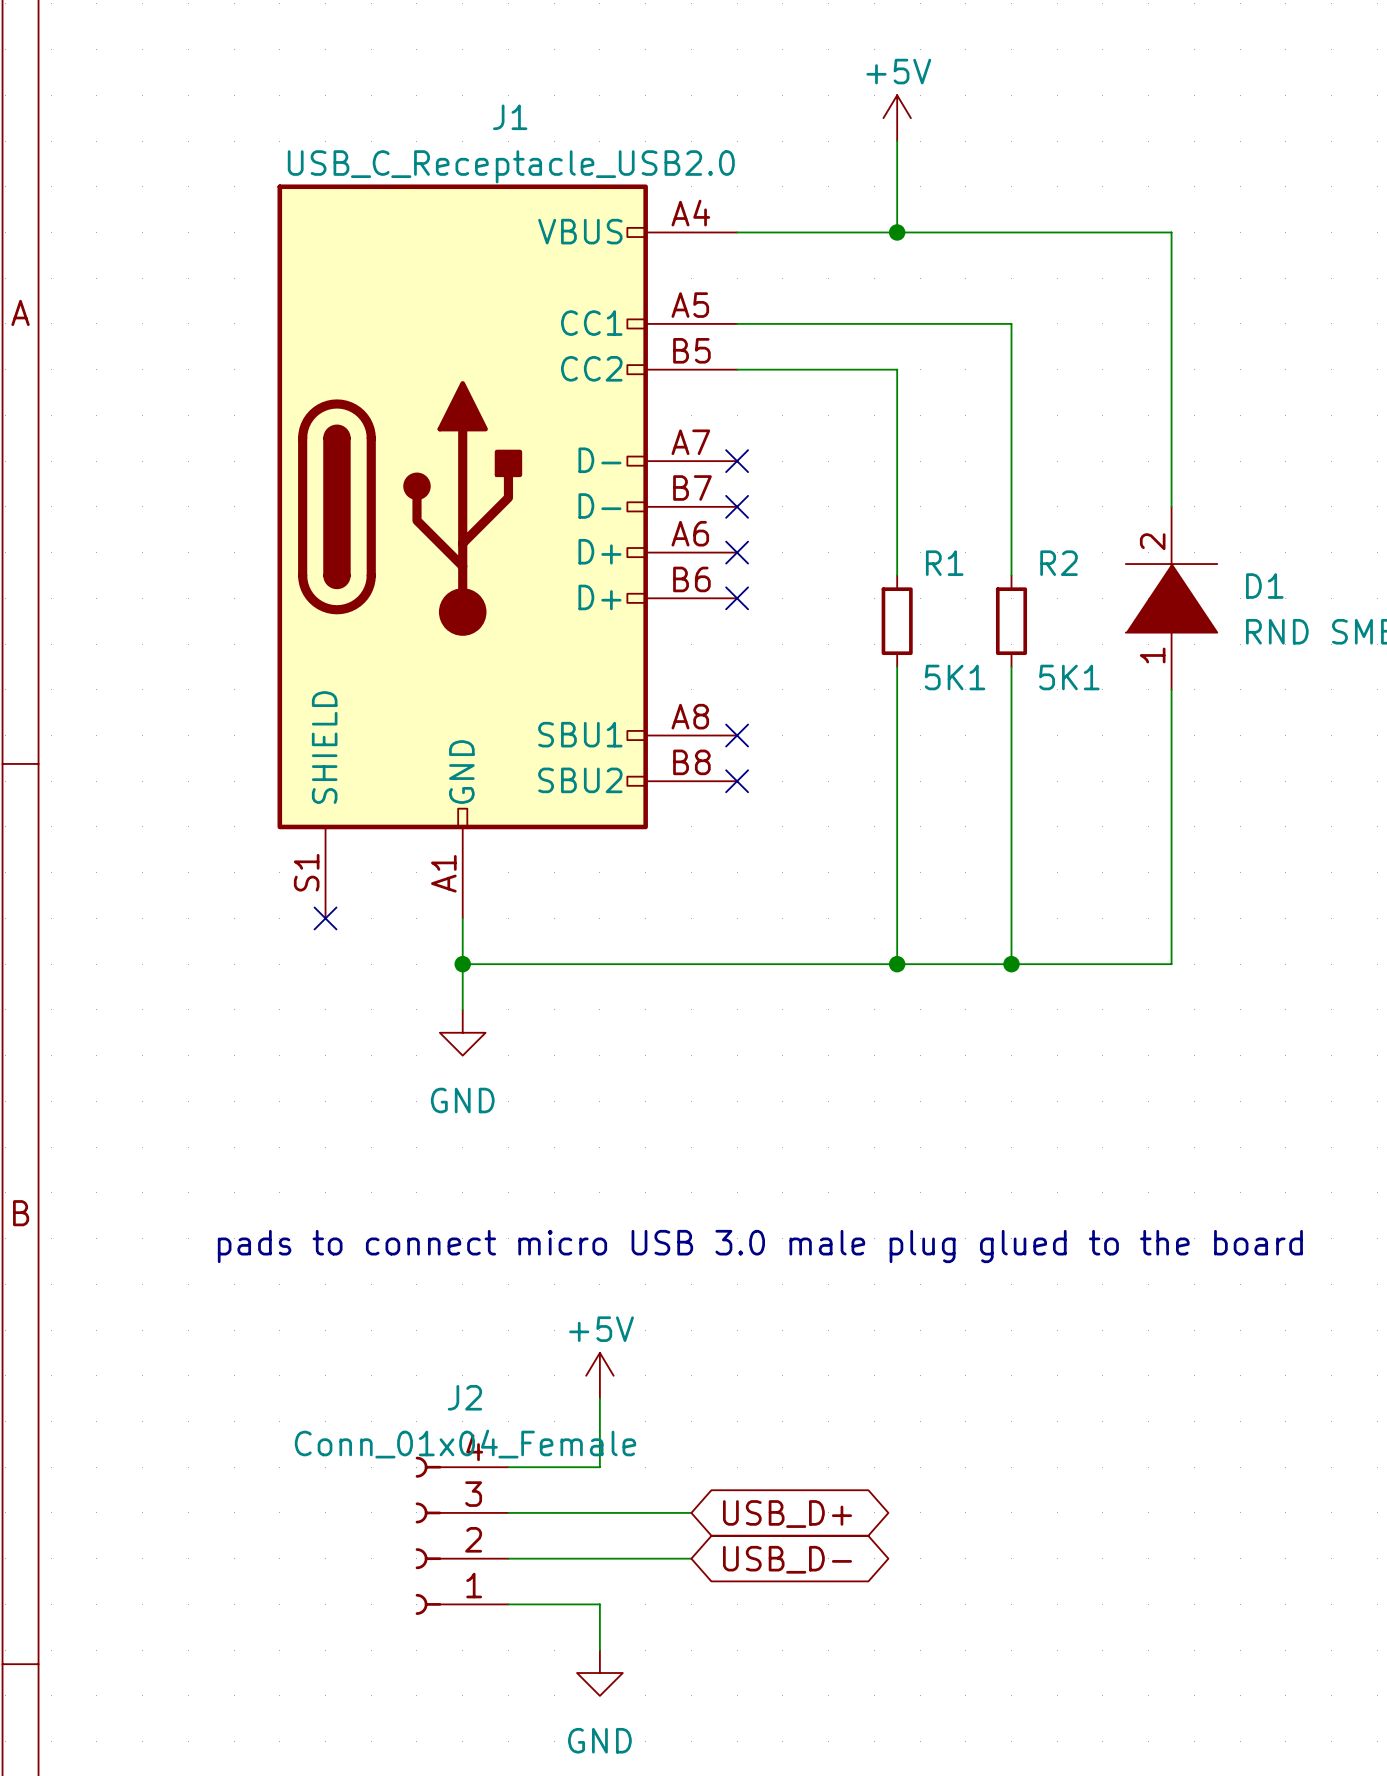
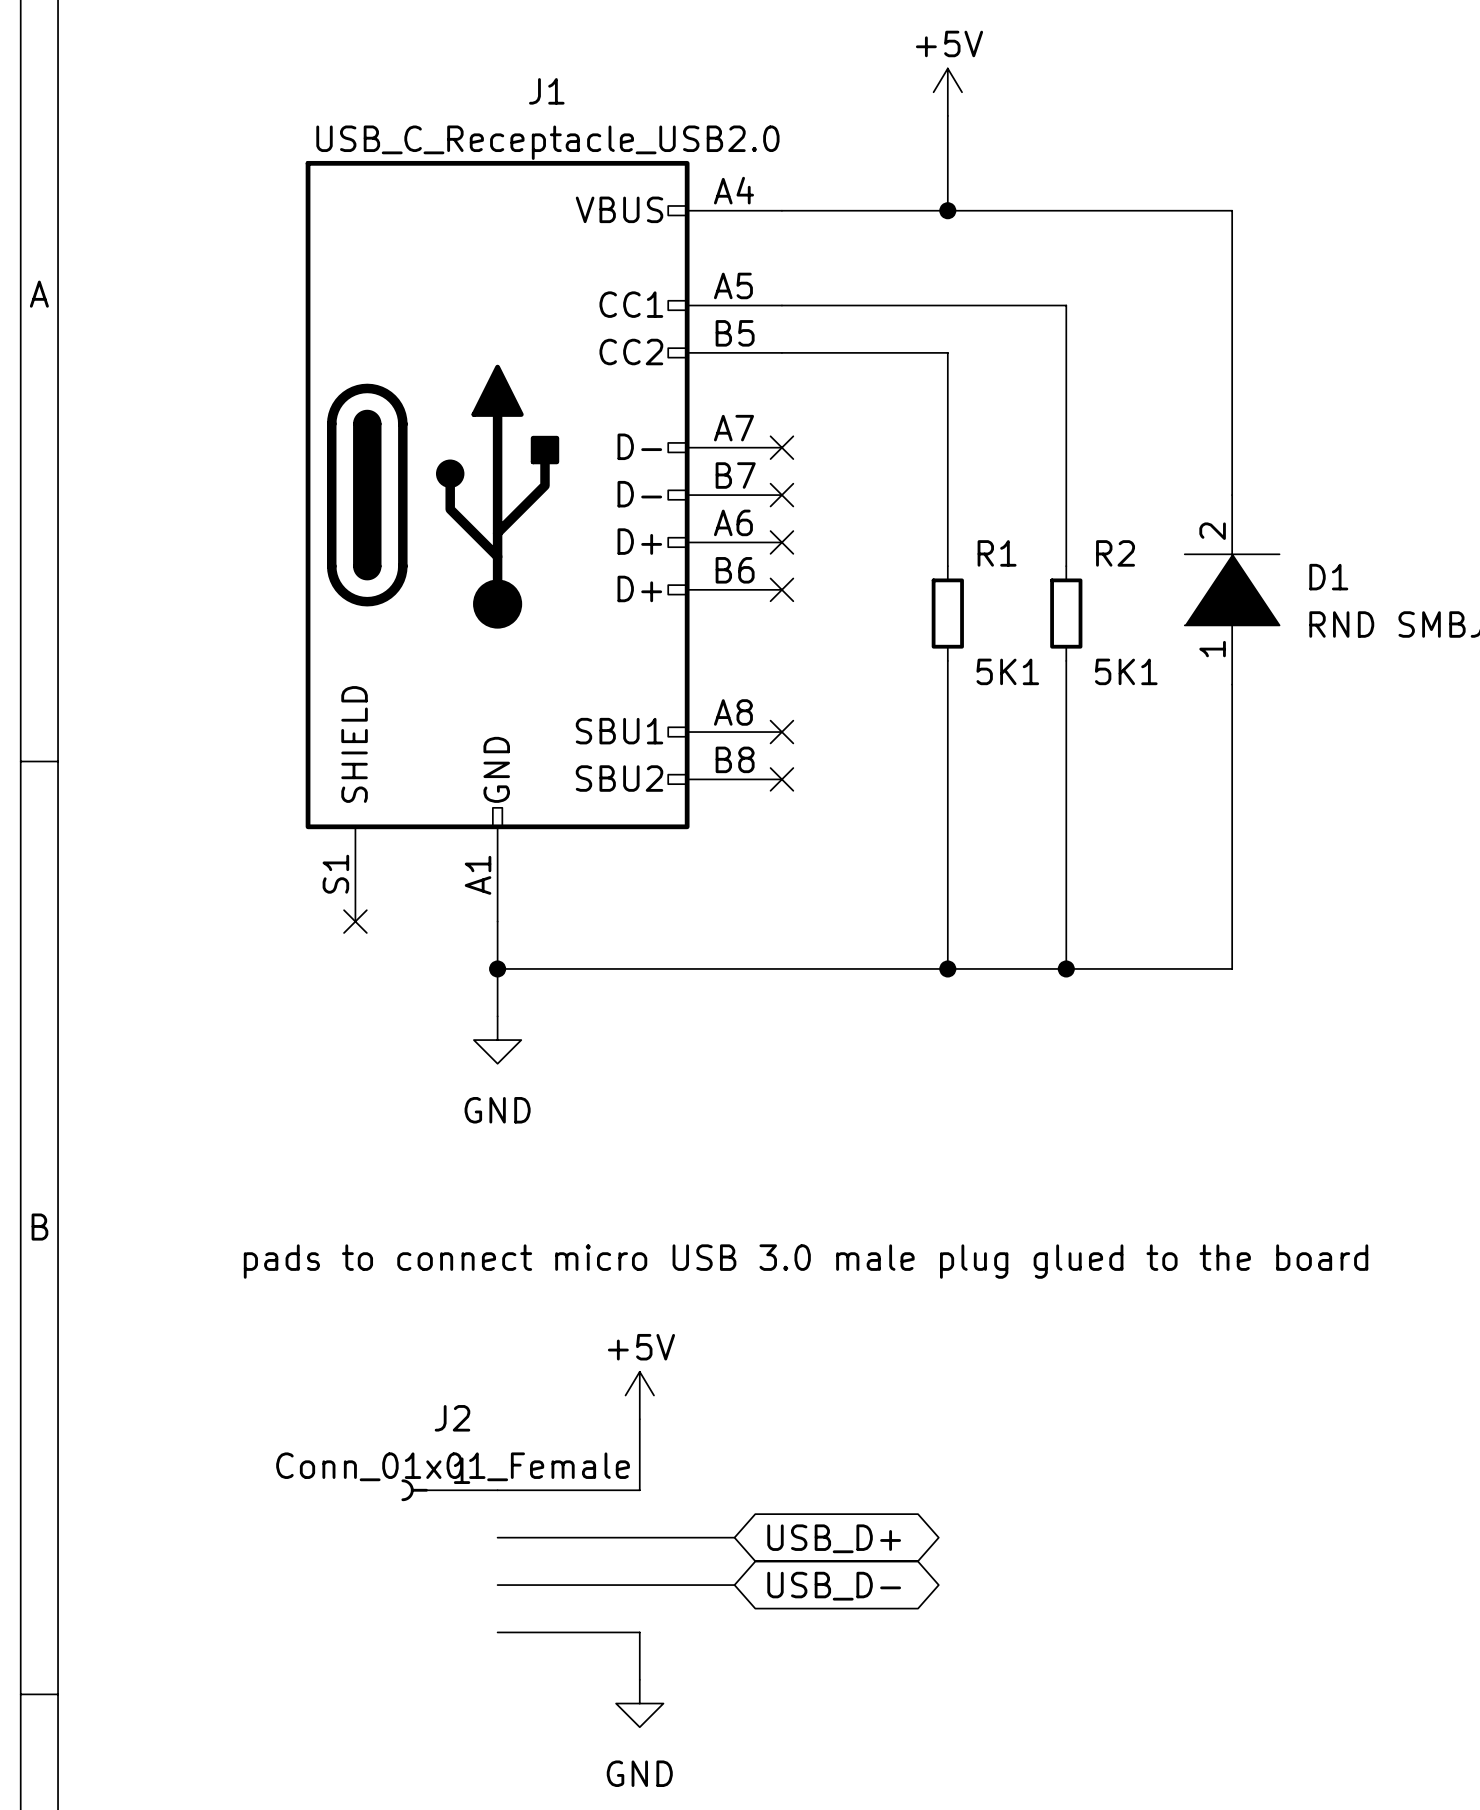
J2 name position: J2 (464, 1397) -> J2 (452, 1418)
J2 value: Conn_01x04_Female (465, 1444) -> Conn_01x01_Female (453, 1466)
J2 symbol: [415, 1456, 509, 1615] -> [401, 1479, 498, 1502]

